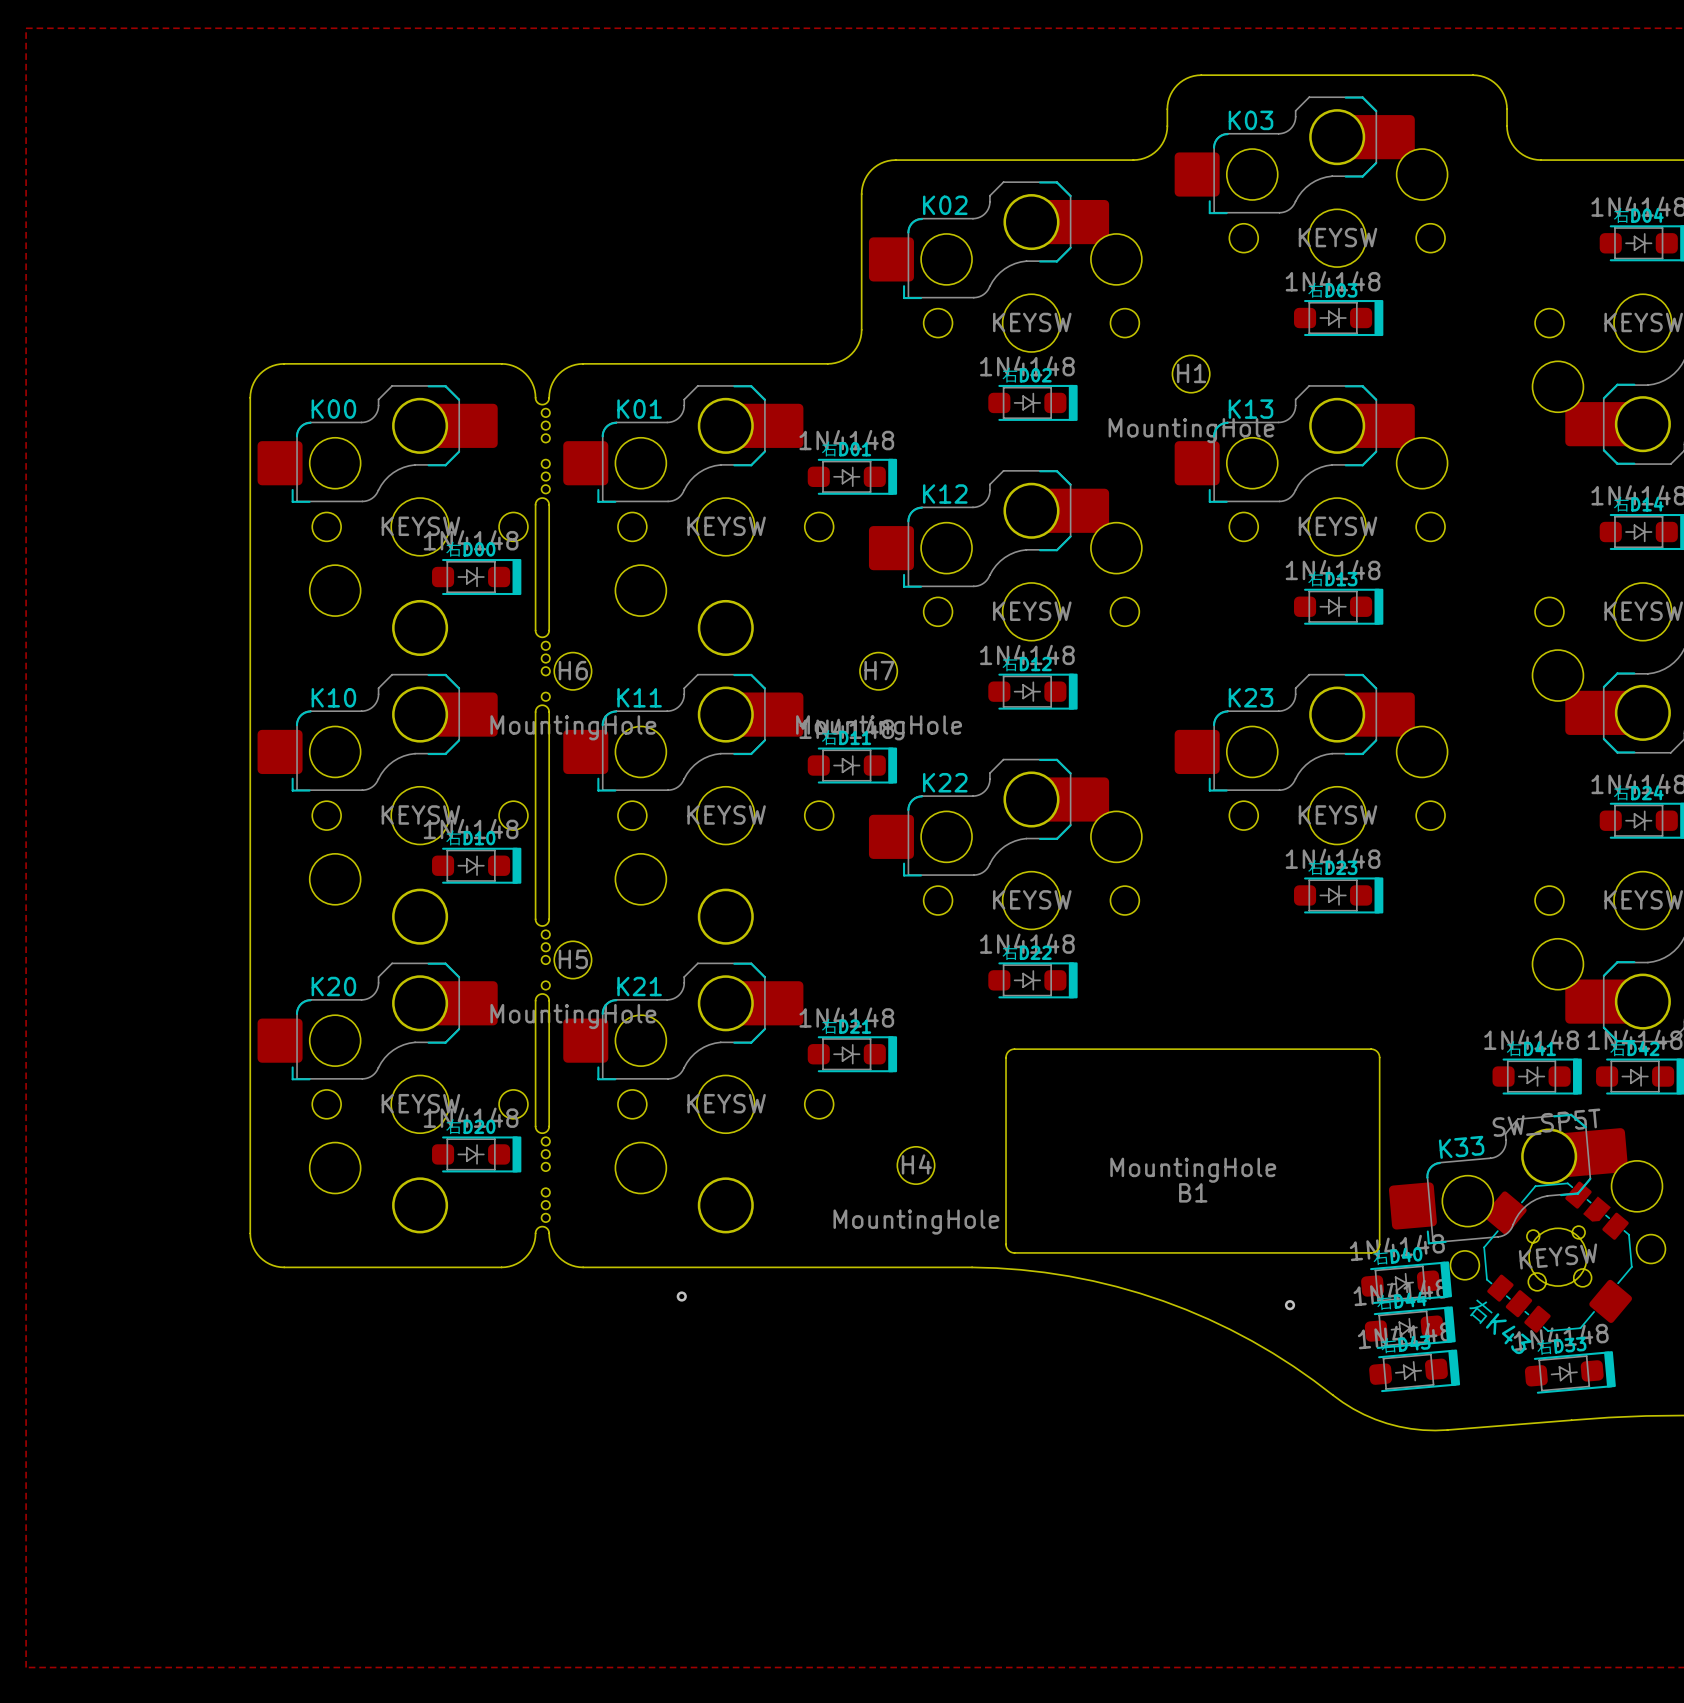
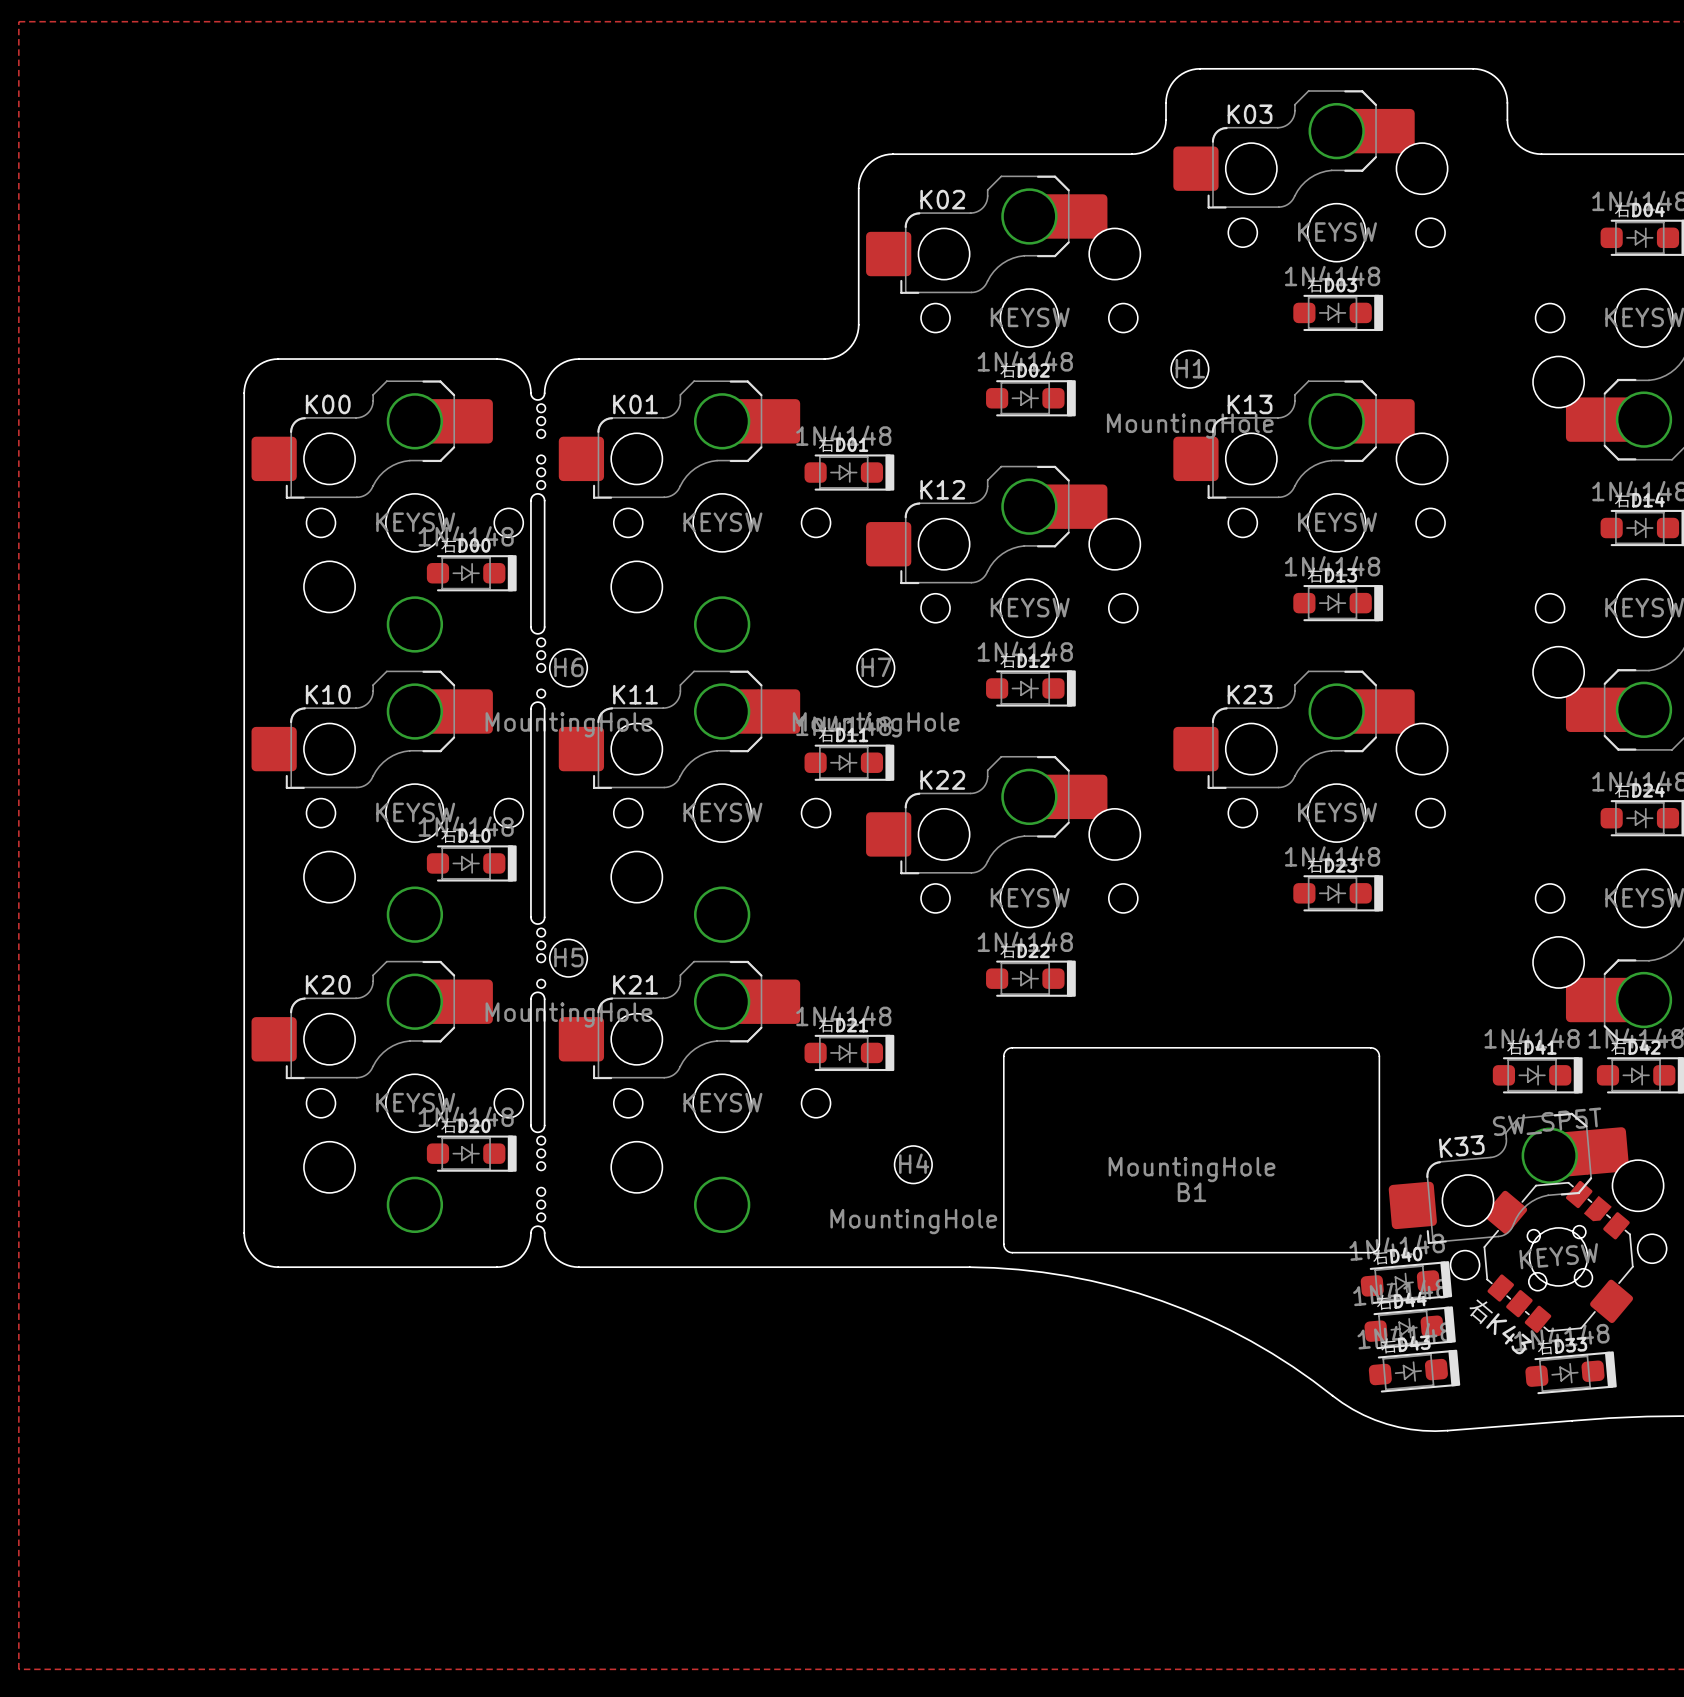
via: (681, 1296) -> none
via: (1290, 1305) -> none

